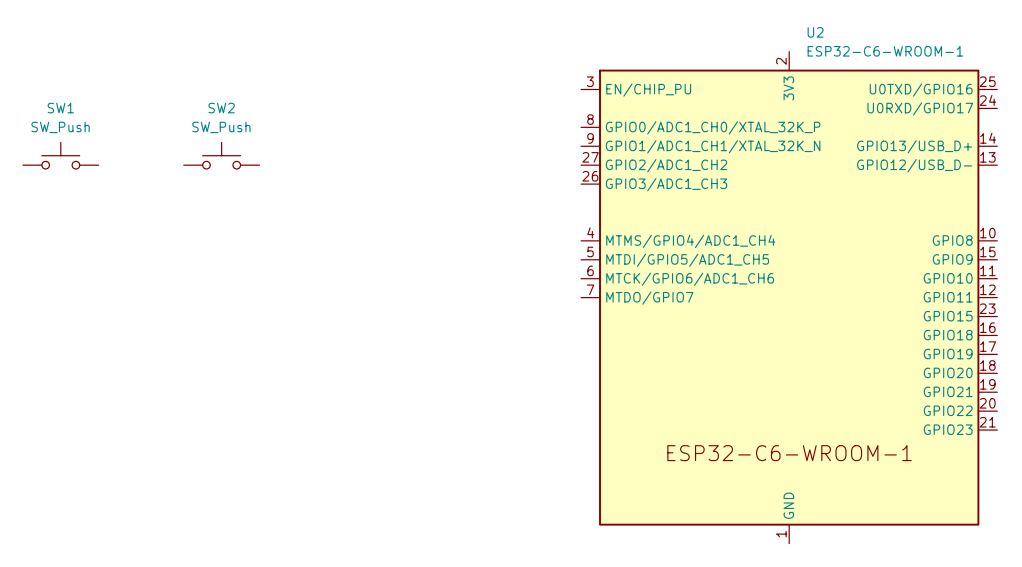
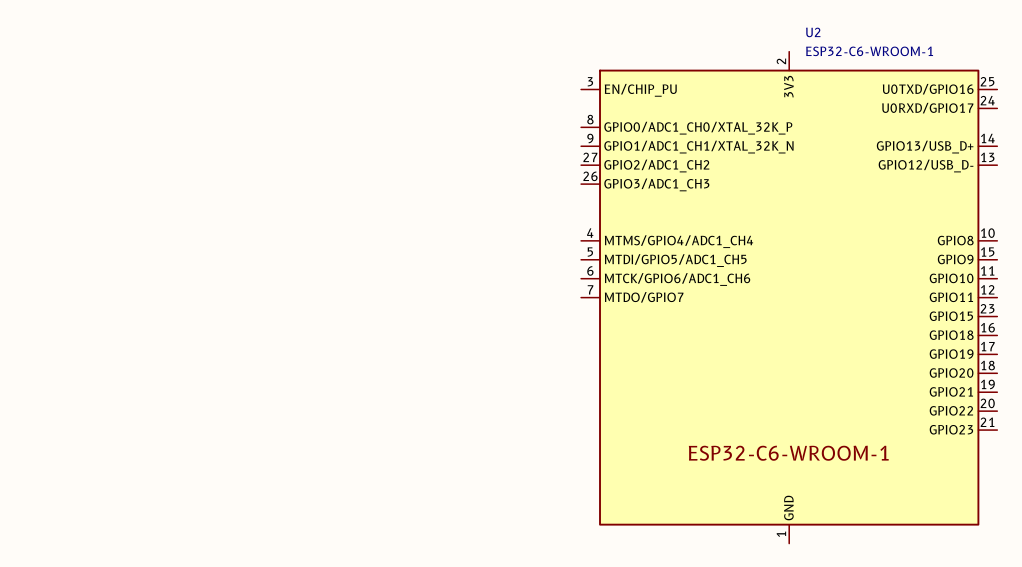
SW1: SW_Push (60, 155) -> none
SW2: SW_Push (221, 155) -> none

